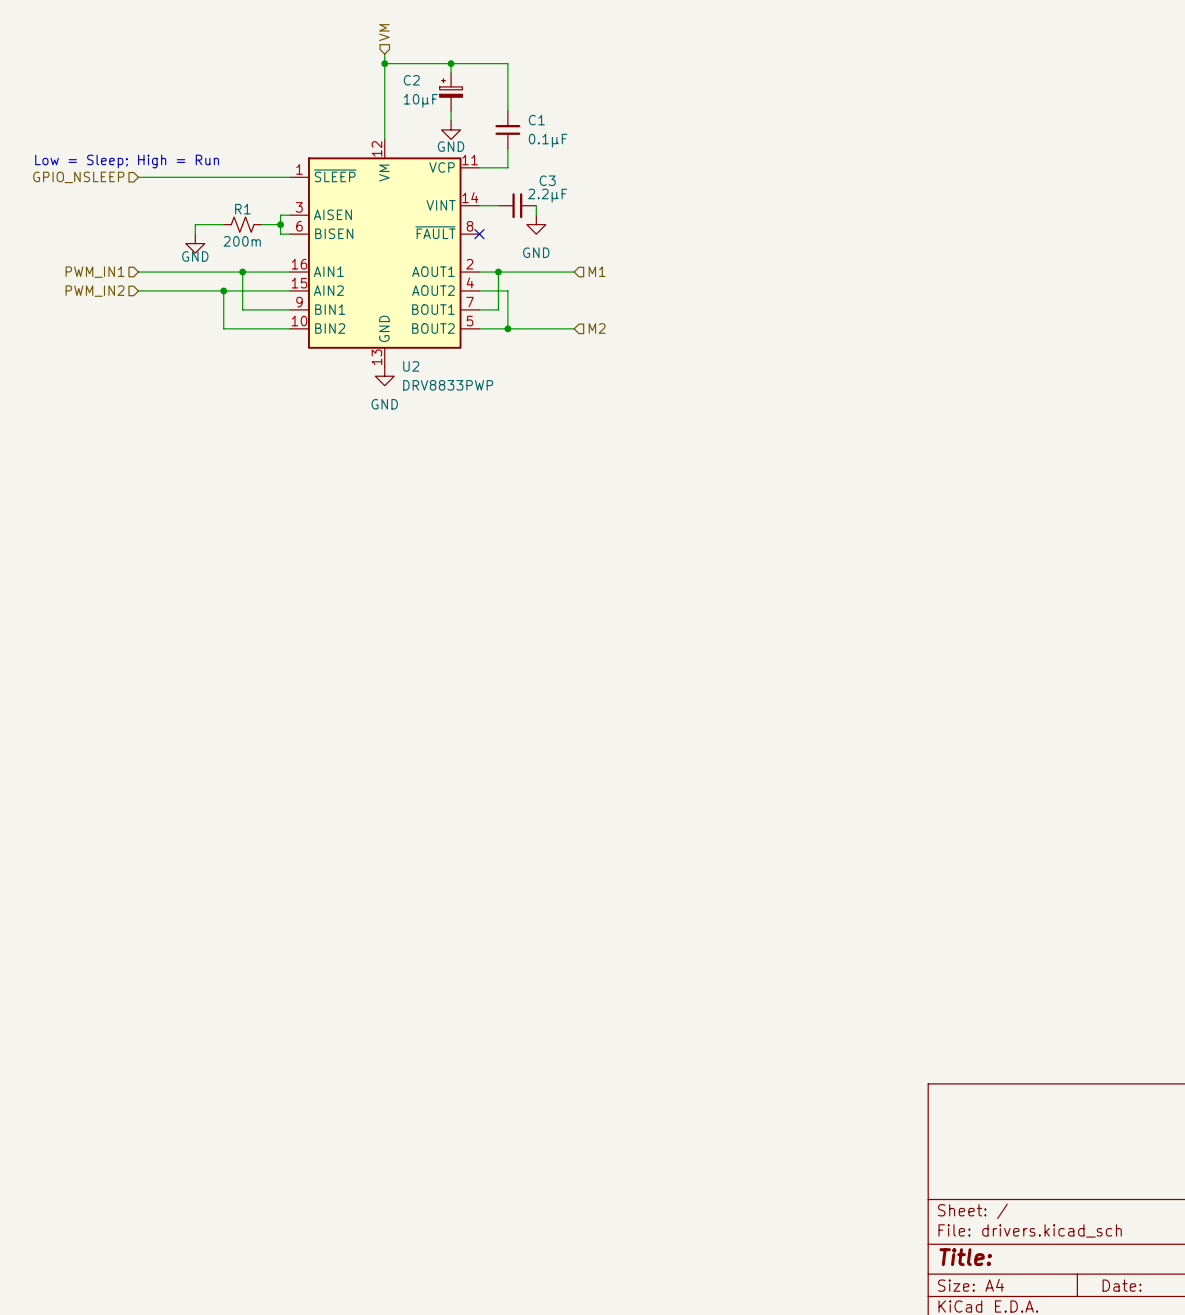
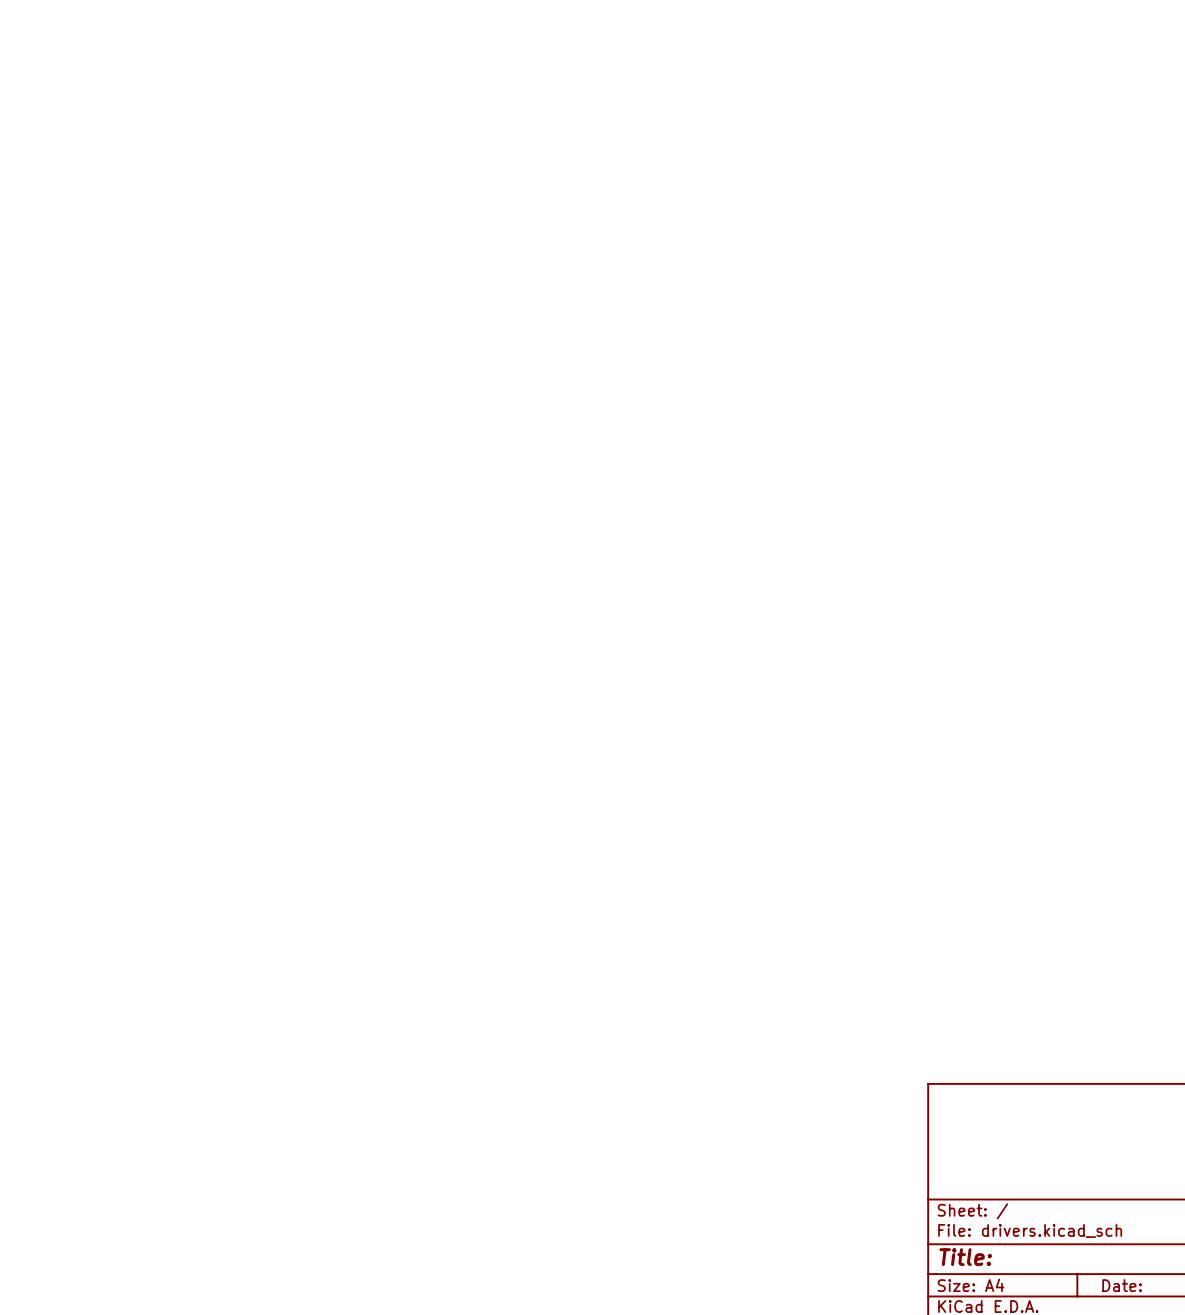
hierarchical label: VM (384, 32) -> none
wire: (384, 54) (384, 139) -> none
wire: (384, 63) (507, 63) (507, 110) -> none
junction: (384, 63) -> none
wire: (451, 63) (451, 73) -> none
junction: (451, 63) -> none
C2: 10µF (451, 92) -> none
wire: (451, 110) (451, 120) -> none
power symbol: GND (451, 129) -> none
C1: 0.1µF (507, 129) -> none
wire: (507, 148) (507, 167) (479, 167) -> none
text: Low = Sleep; High = Run (127, 161) -> none
hierarchical label: GPIO_NSLEEP (78, 177) -> none
wire: (138, 177) (290, 177) -> none
wire: (479, 205) (498, 205) -> none
C3: 2.2µF (517, 205) -> none
wire: (536, 205) (536, 215) -> none
wire: (290, 215) (280, 215) (280, 234) (290, 234) -> none
wire: (223, 224) (195, 224) (195, 234) -> none
R1: 200m (242, 224) -> none
wire: (261, 224) (280, 224) -> none
junction: (280, 224) -> none
power symbol: GND (536, 224) -> none
no-connect mark: (479, 234) -> none
power symbol: GND (195, 243) -> none
U2: DRV8833PWP (384, 253) -> none
hierarchical label: M1 (597, 271) -> none
hierarchical label: PWM_IN1 (95, 272) -> none
wire: (138, 272) (290, 272) -> none
wire: (242, 272) (242, 309) (290, 309) -> none
junction: (242, 272) -> none
wire: (479, 272) (574, 272) -> none
wire: (498, 272) (498, 309) (479, 309) -> none
junction: (498, 272) -> none
wire: (138, 290) (290, 290) -> none
wire: (223, 290) (223, 328) (290, 328) -> none
junction: (223, 290) -> none
wire: (479, 290) (507, 290) (507, 328) -> none
hierarchical label: PWM_IN2 (95, 291) -> none
wire: (479, 328) (574, 328) -> none
junction: (507, 328) -> none
hierarchical label: M2 (597, 328) -> none
power symbol: GND (384, 376) -> none

